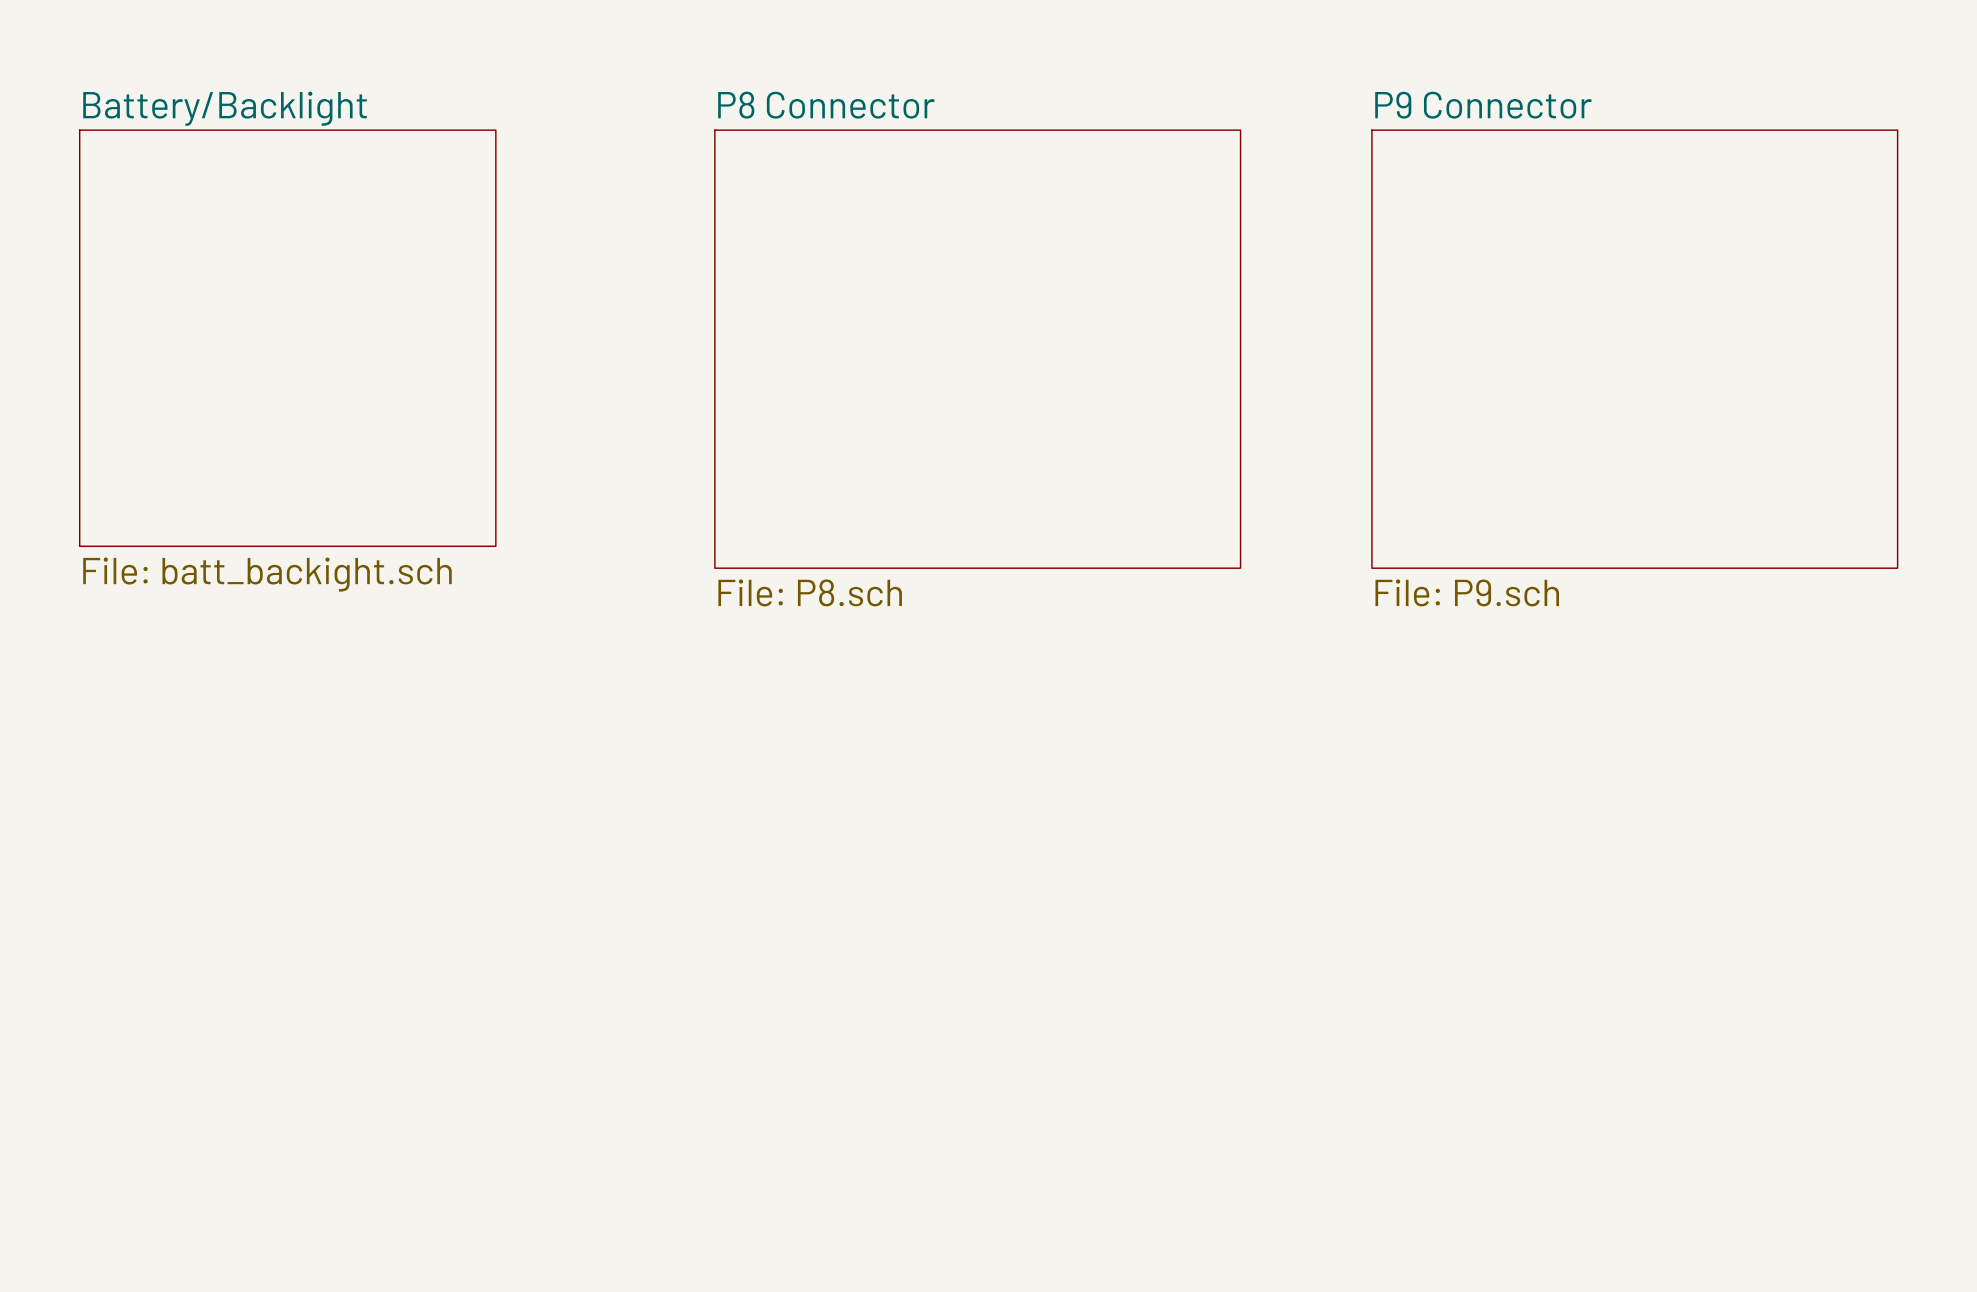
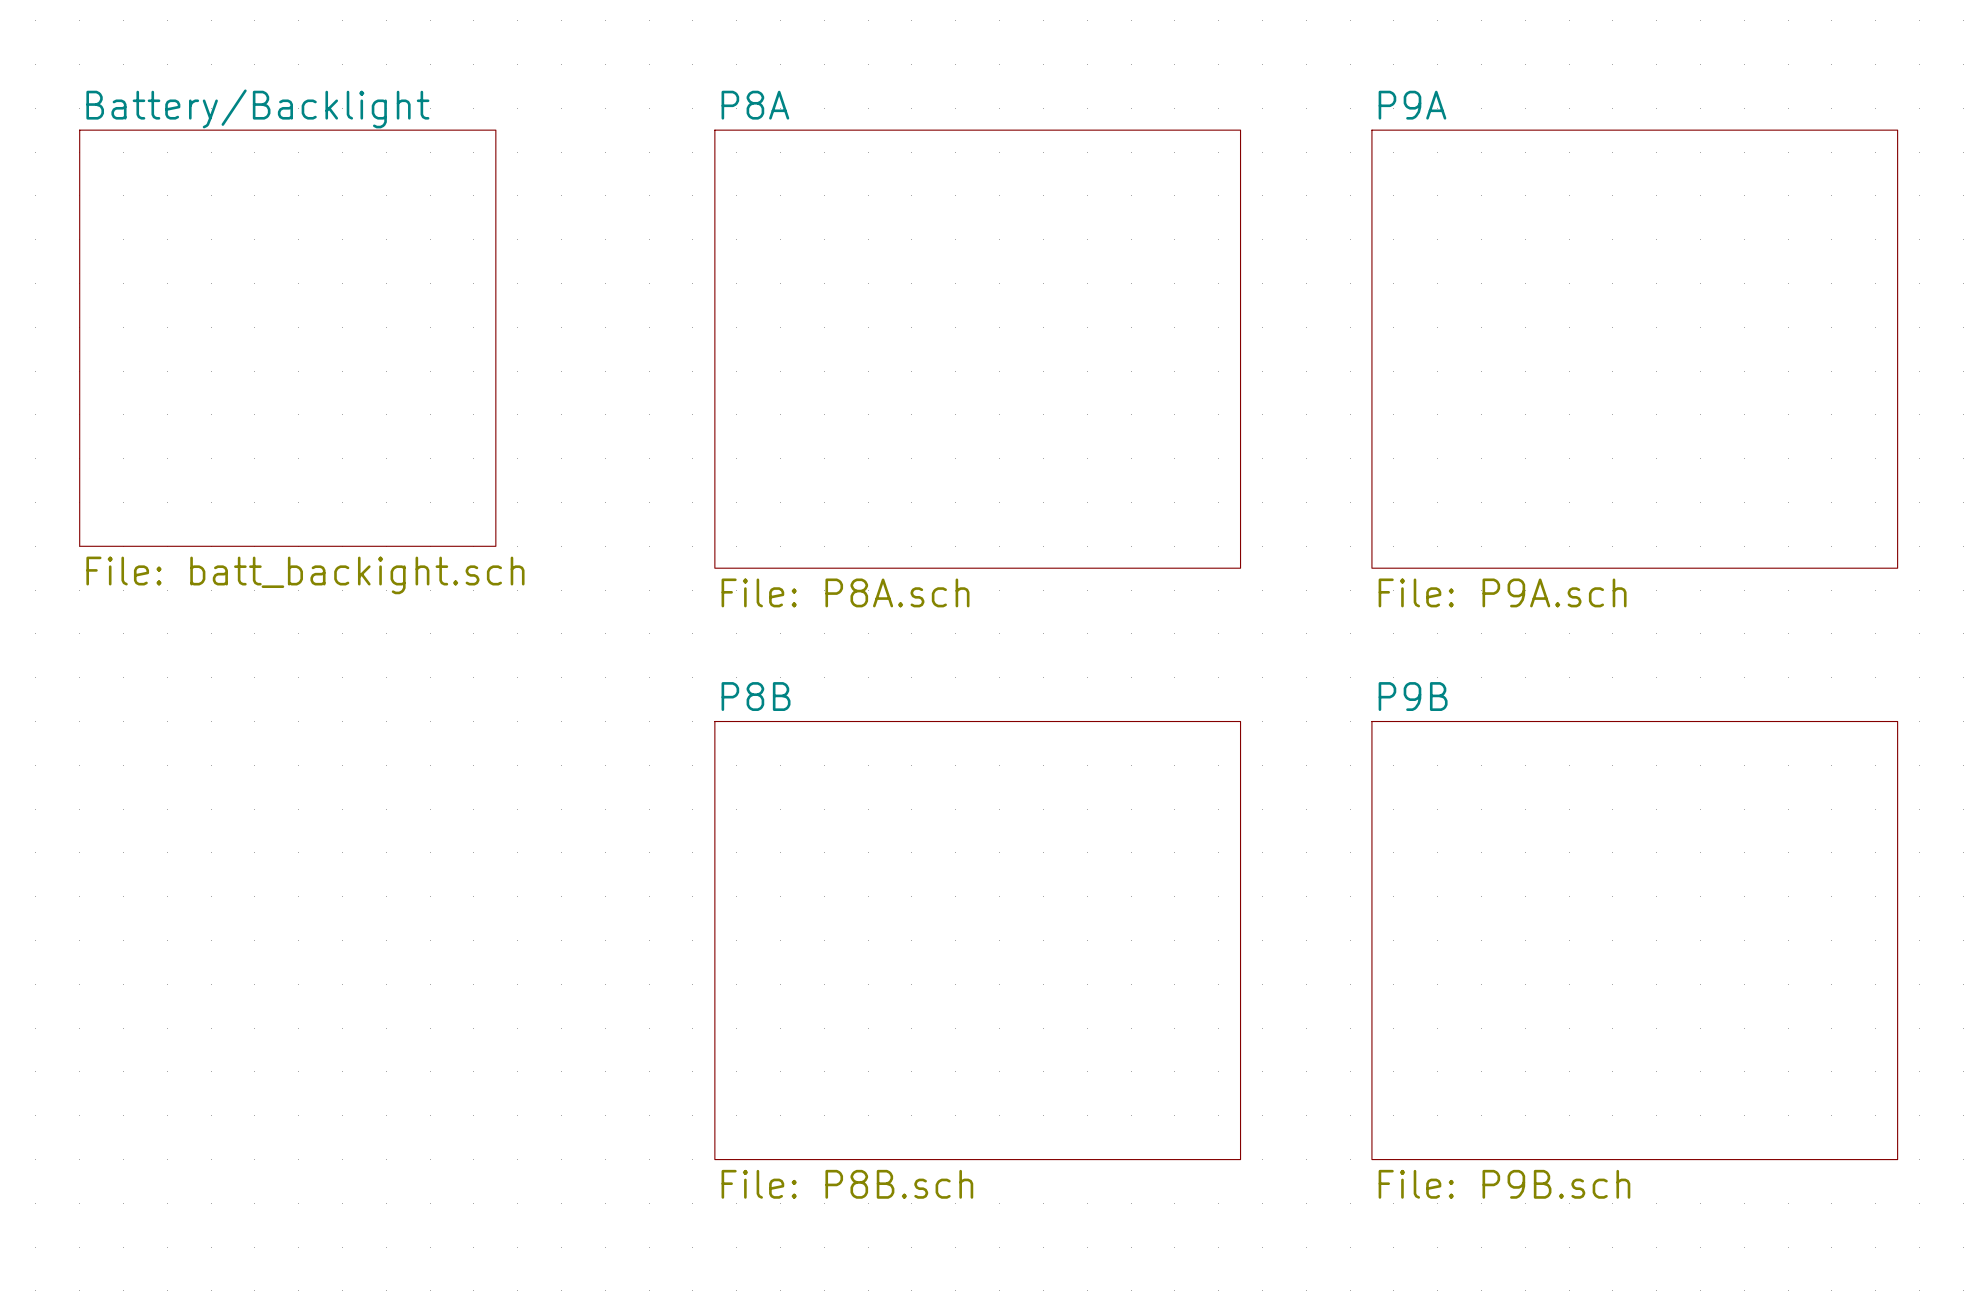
sheet P8 Connector name: P8 Connector (826, 105) -> P8A (755, 105)
sheet P9 Connector name: P9 Connector (1483, 105) -> P9A (1412, 105)
sheet P8 Connector value: File: P8.sch (810, 592) -> File: P8A.sch (845, 592)
sheet P9 Connector value: File: P9.sch (1467, 592) -> File: P9A.sch (1502, 592)
sheet P8B: none -> File: P8B.sch (977, 940)
sheet P9B: none -> File: P9B.sch (1634, 940)

